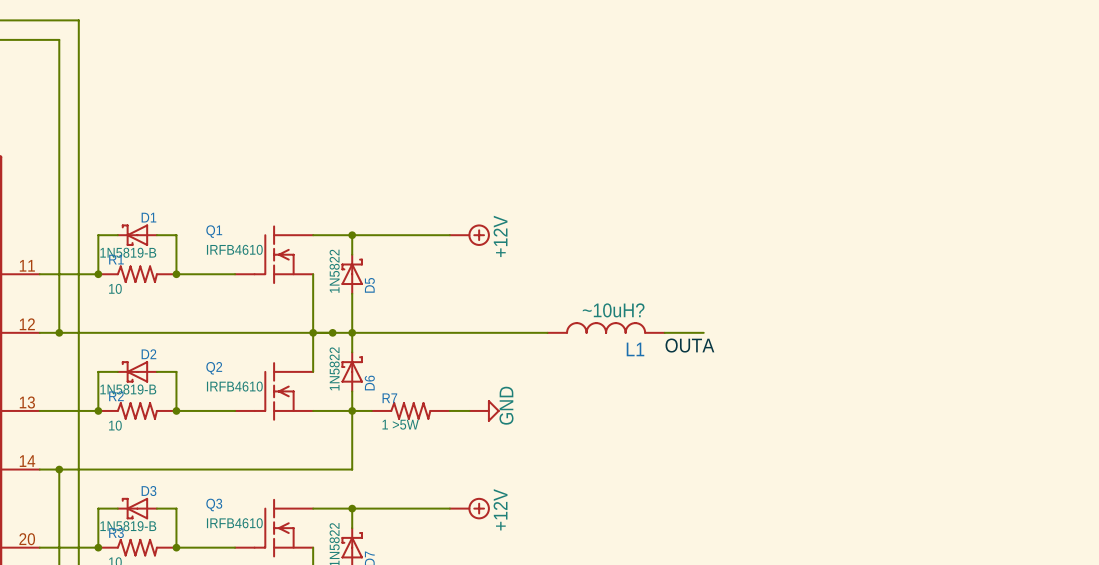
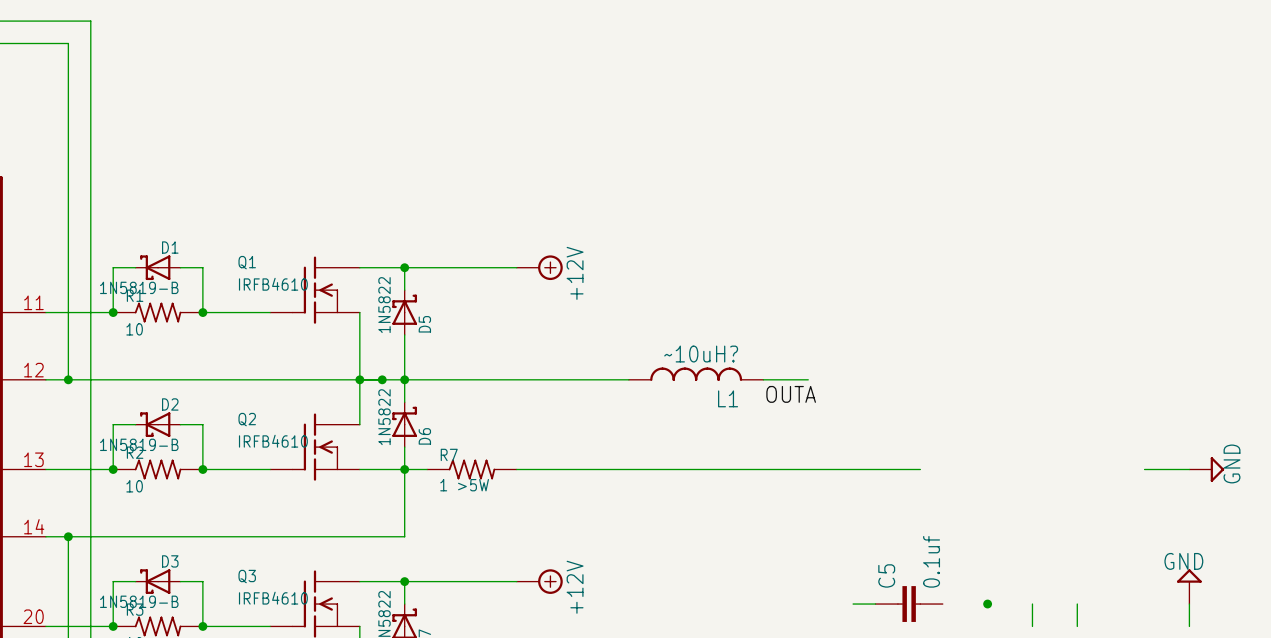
wire: none -> (539, 469) (920, 469)
power symbol: GND (484, 410) -> none
wire: none -> (1144, 469) (1189, 469)
power symbol: none -> GND (1206, 469)
power symbol: none -> GND (1189, 586)
wire: none -> (853, 604) (875, 604)
C5: none -> 0.1uf (909, 604)
junction: none -> (987, 604)
wire: none -> (1032, 604) (1032, 626)
wire: none -> (1077, 604) (1077, 626)
wire: none -> (1189, 604) (1189, 626)

